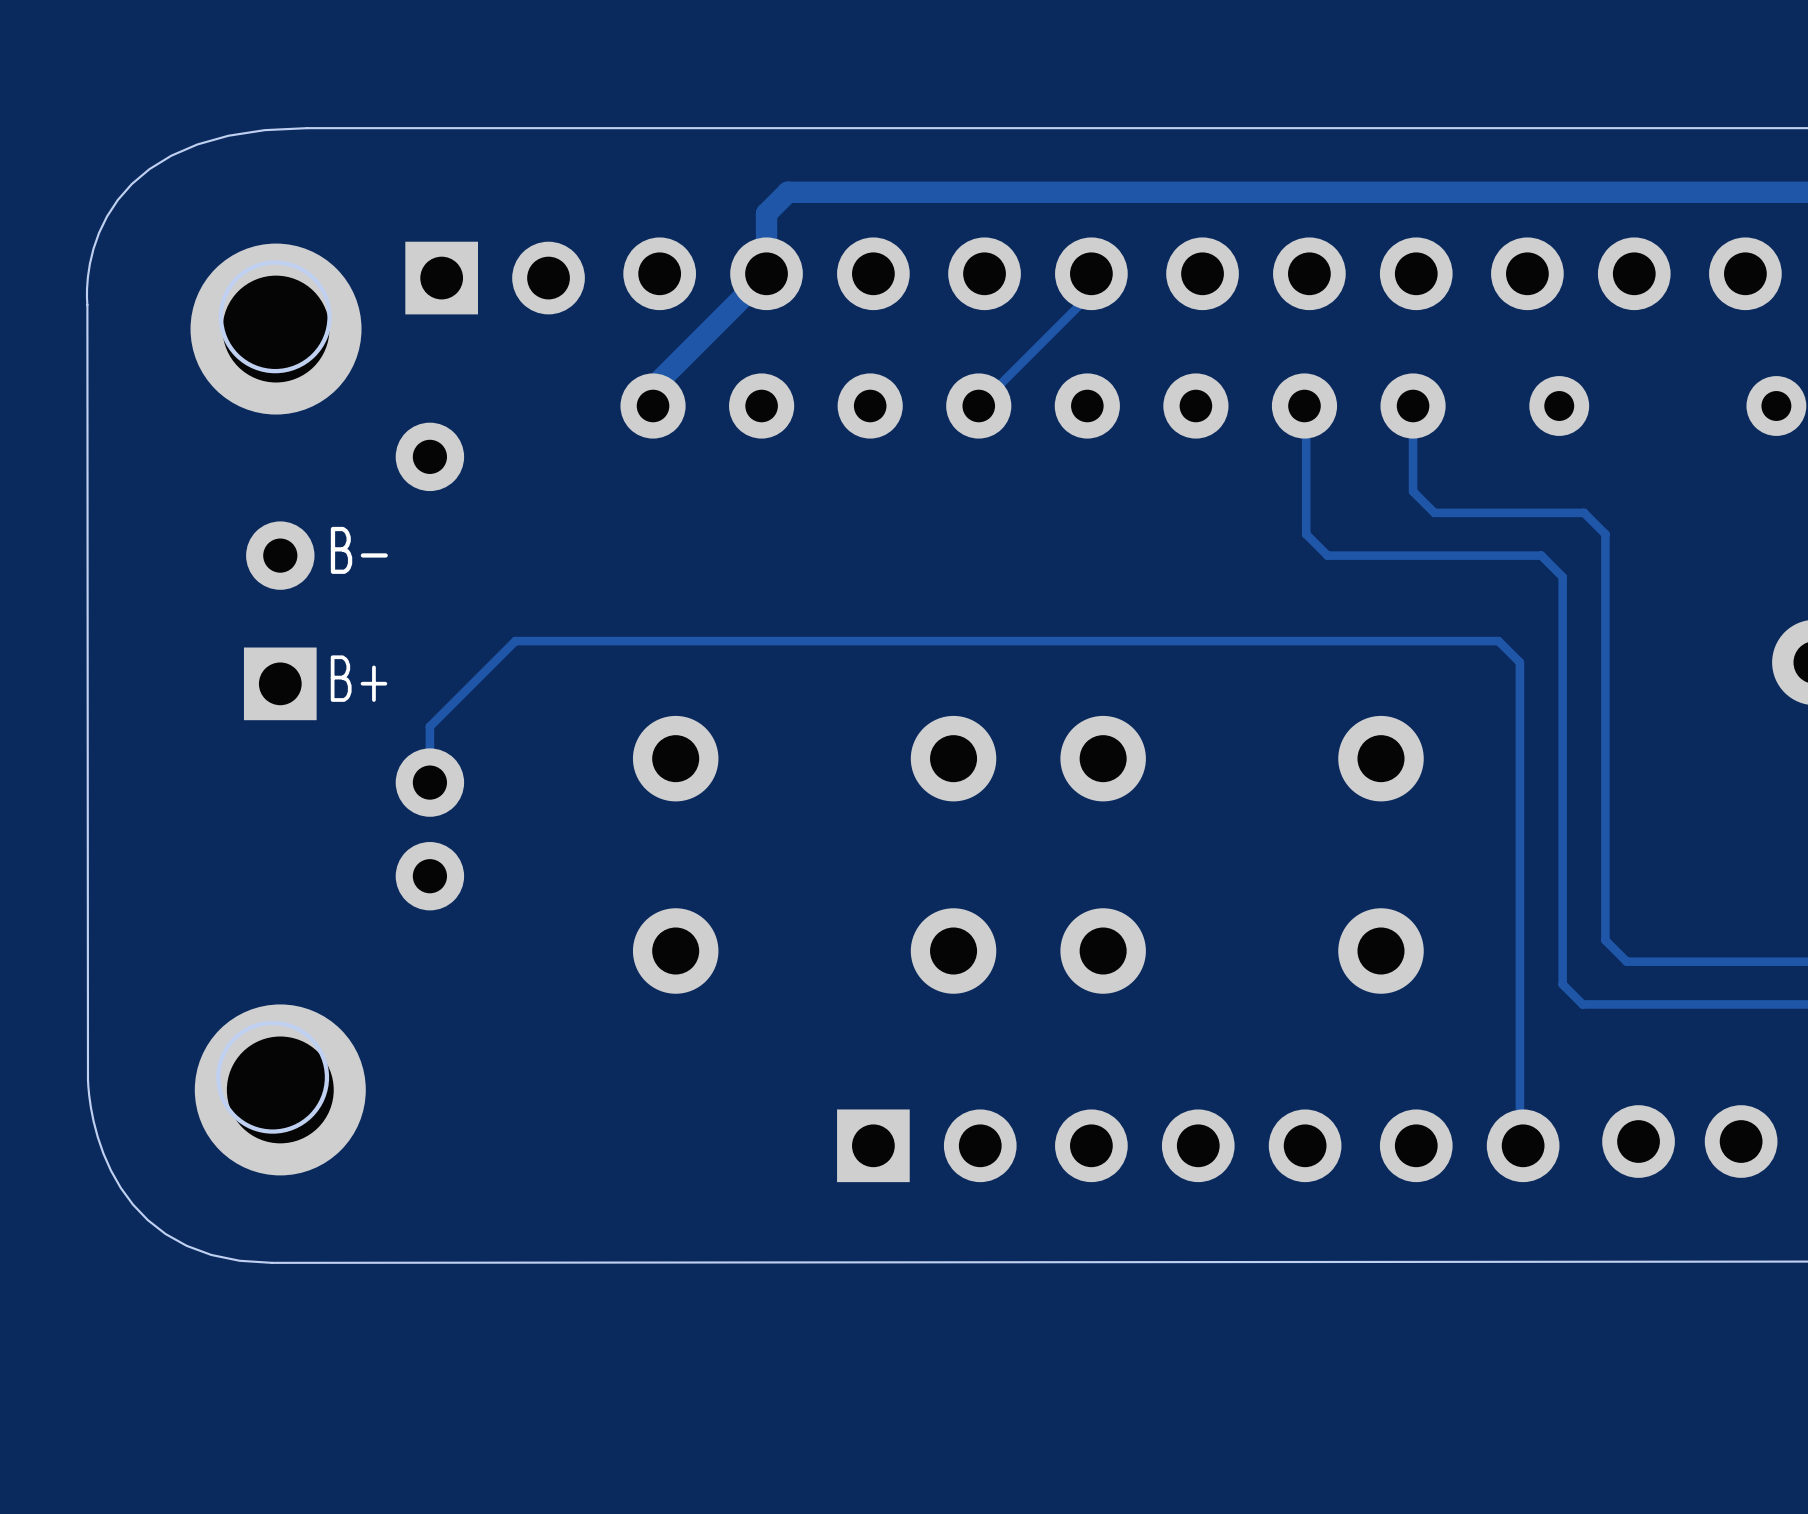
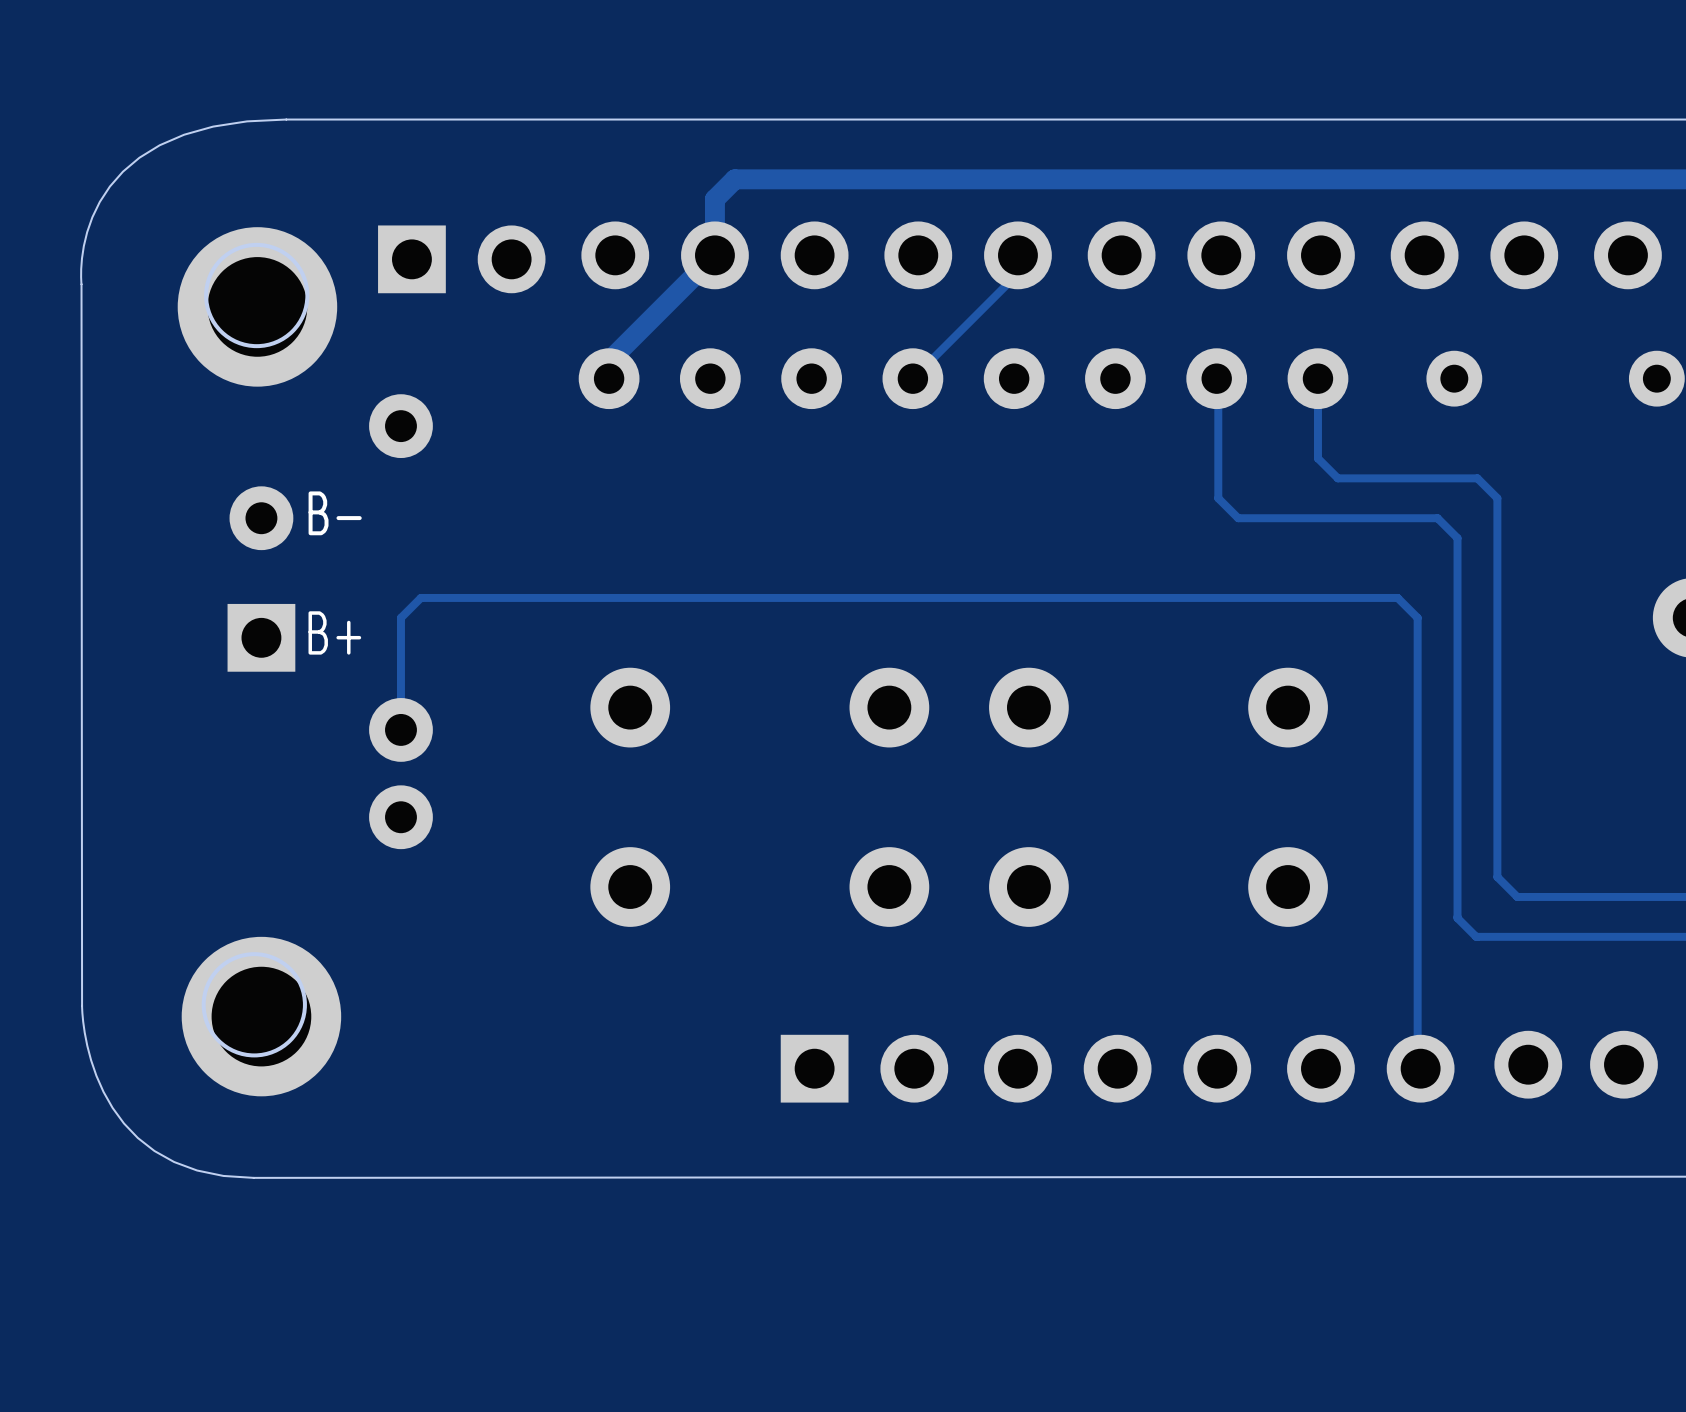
track: (515, 641) (429, 726) -> (480, 597) (420, 597) (400, 617) (400, 677)

